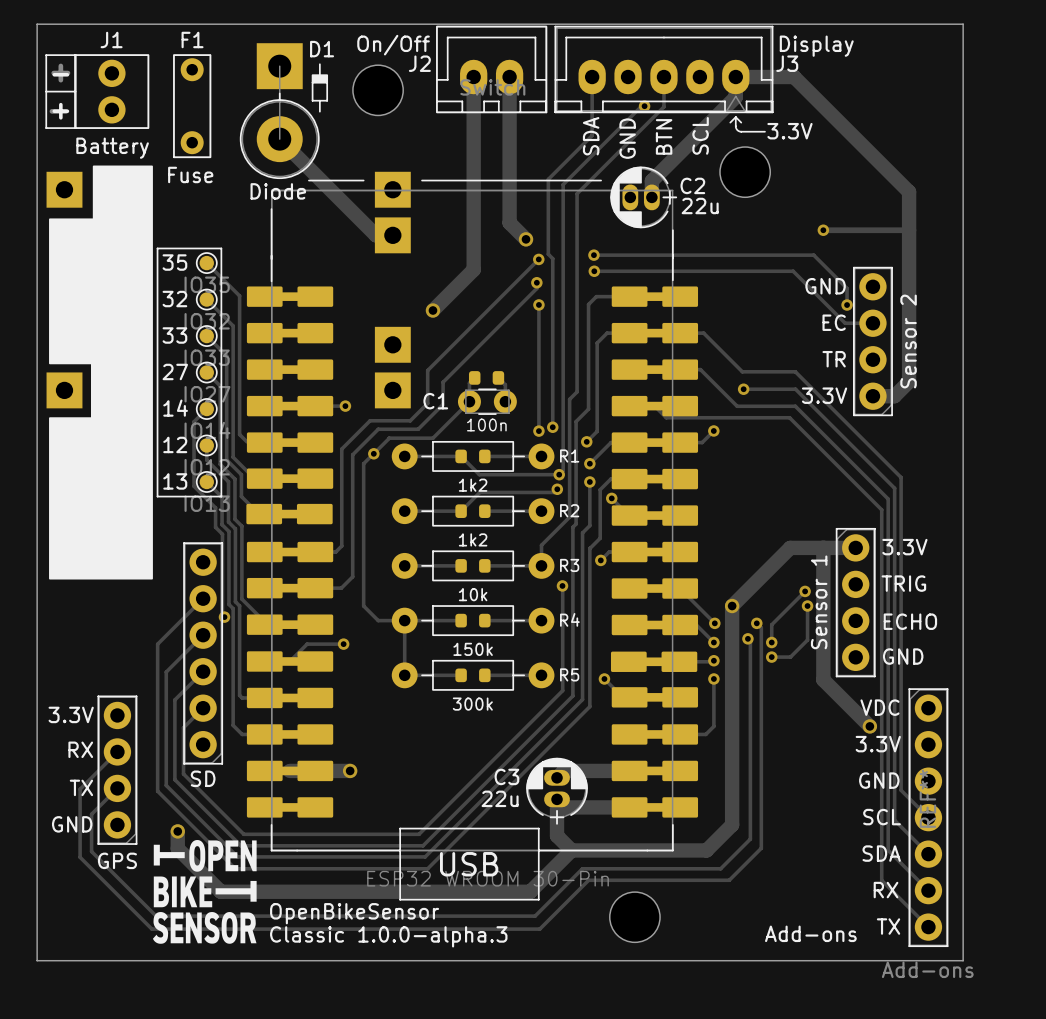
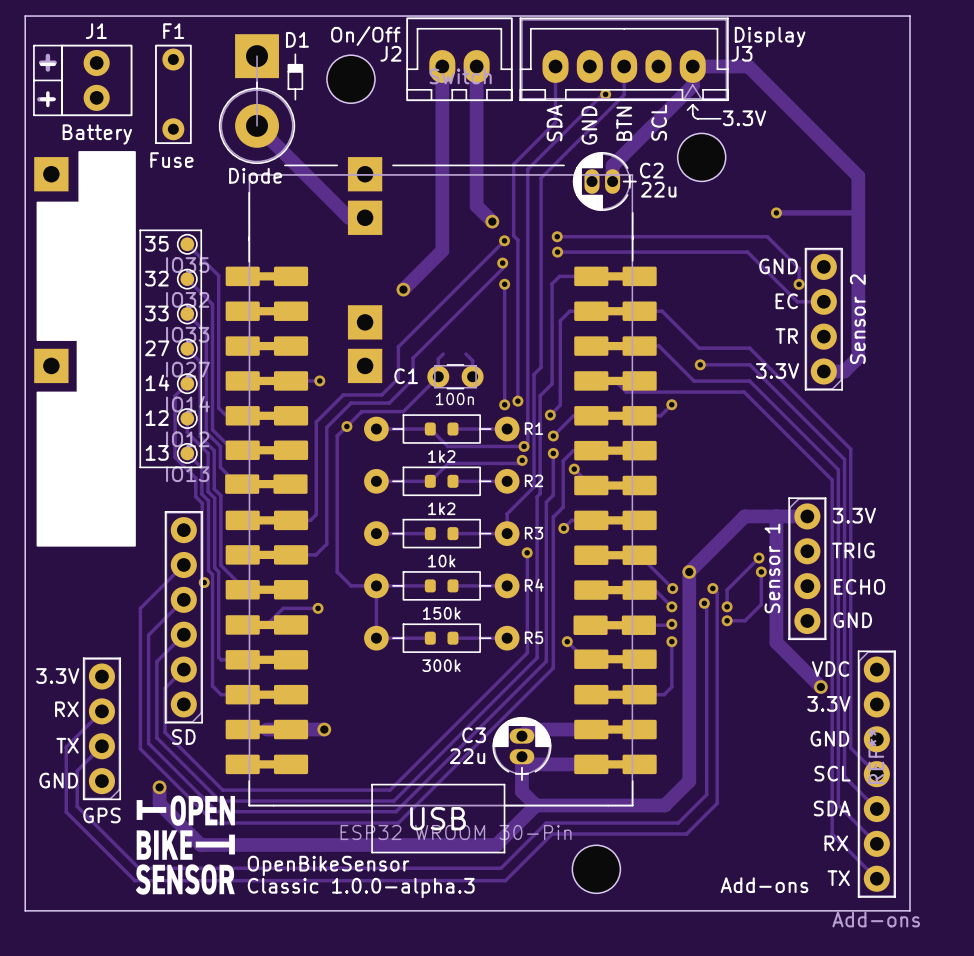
C1 footprint: [457, 371, 517, 415] -> [427, 364, 484, 390]

